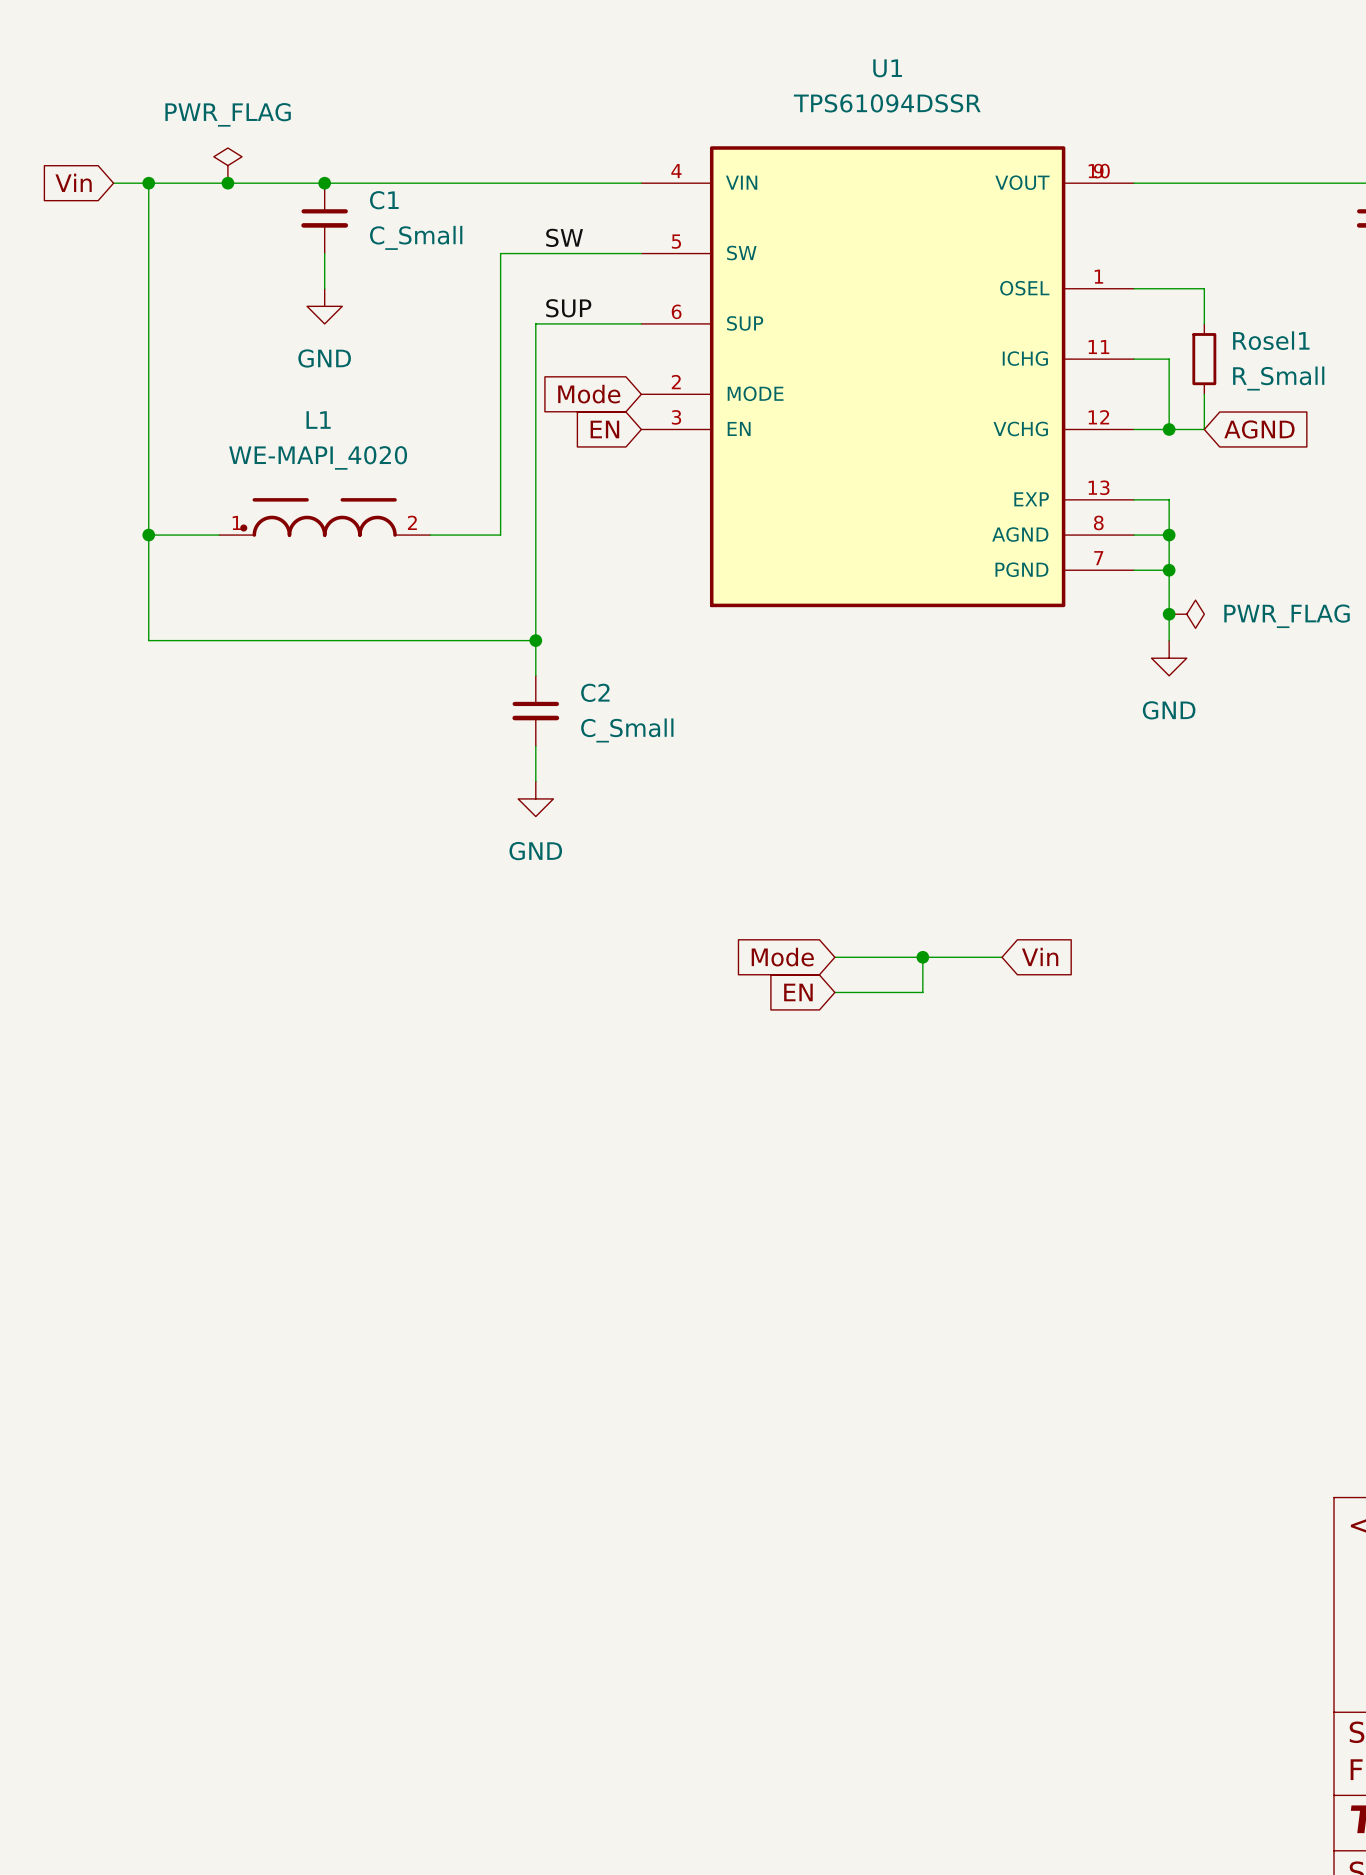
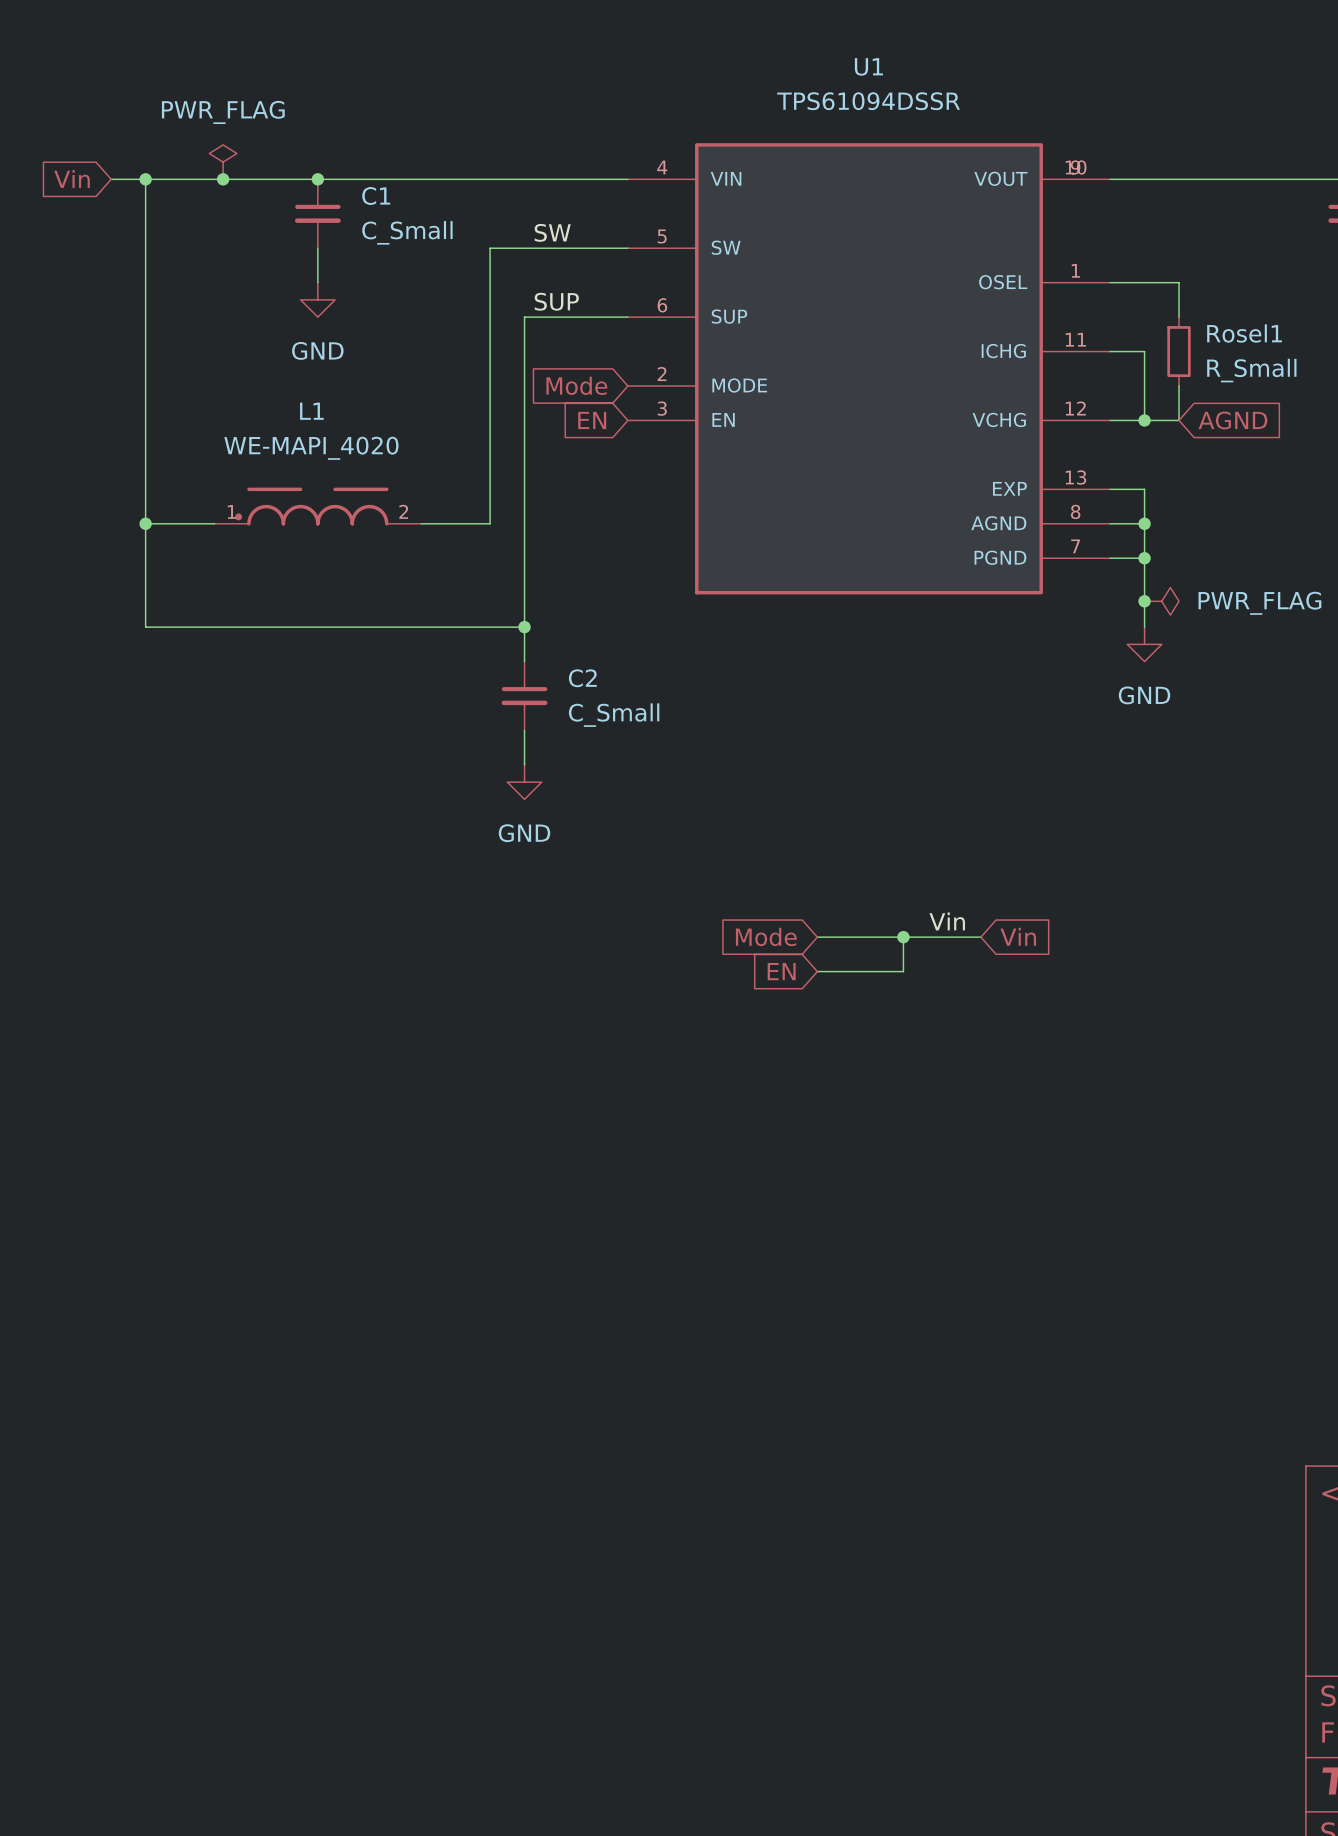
label: none -> Vin (947, 921)

